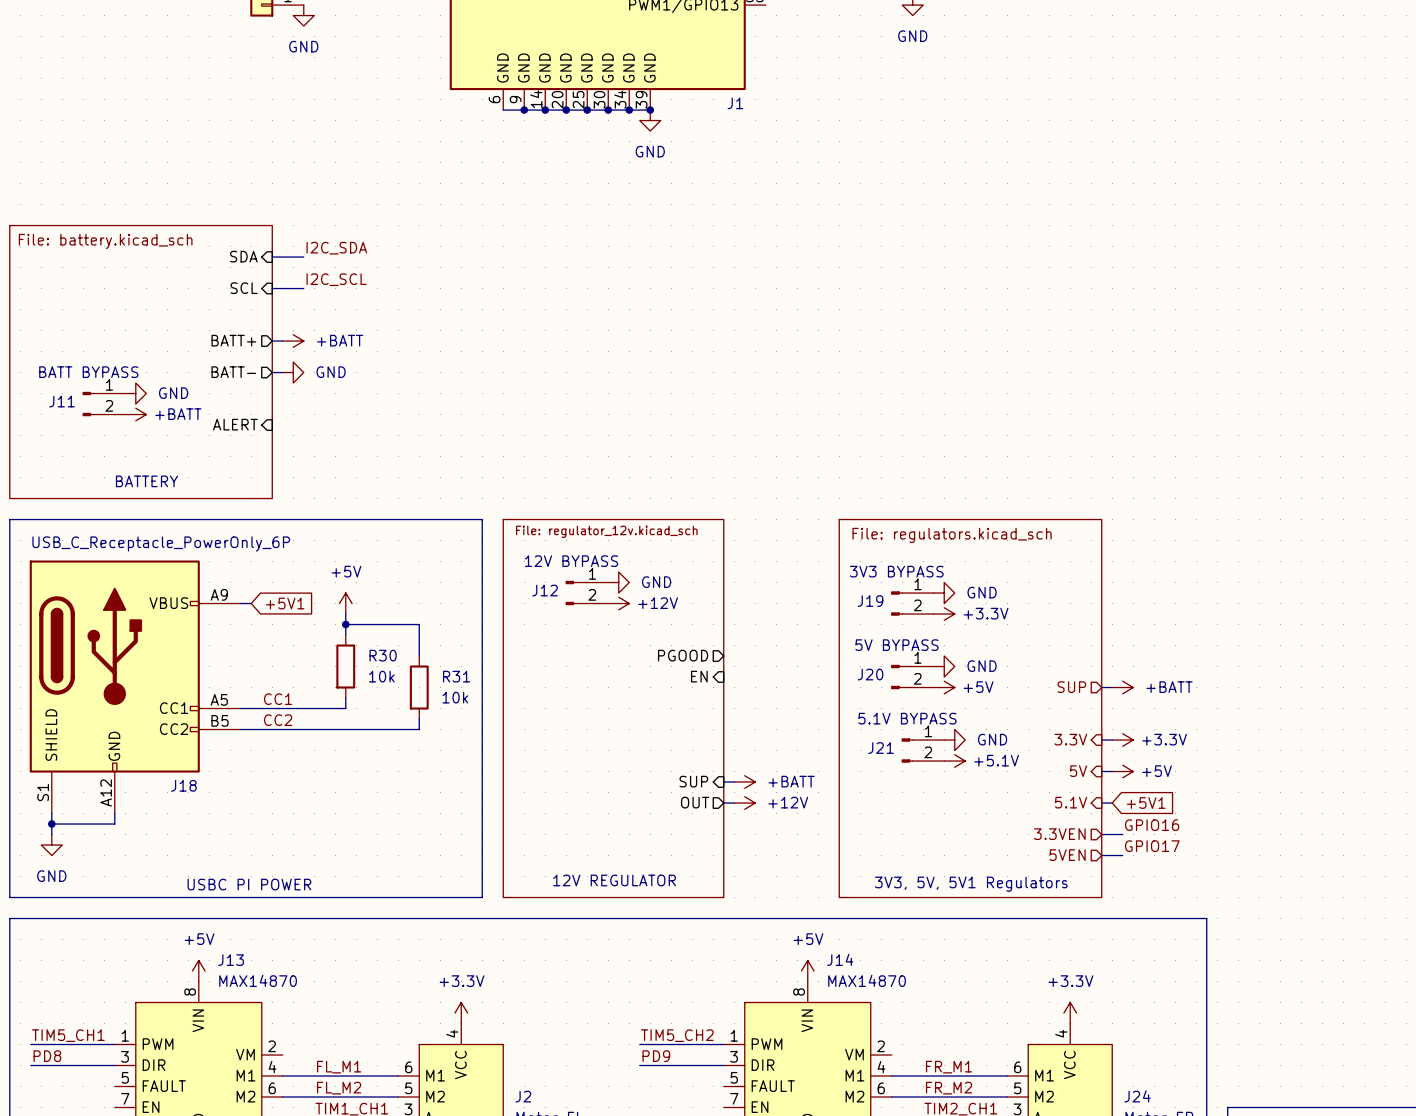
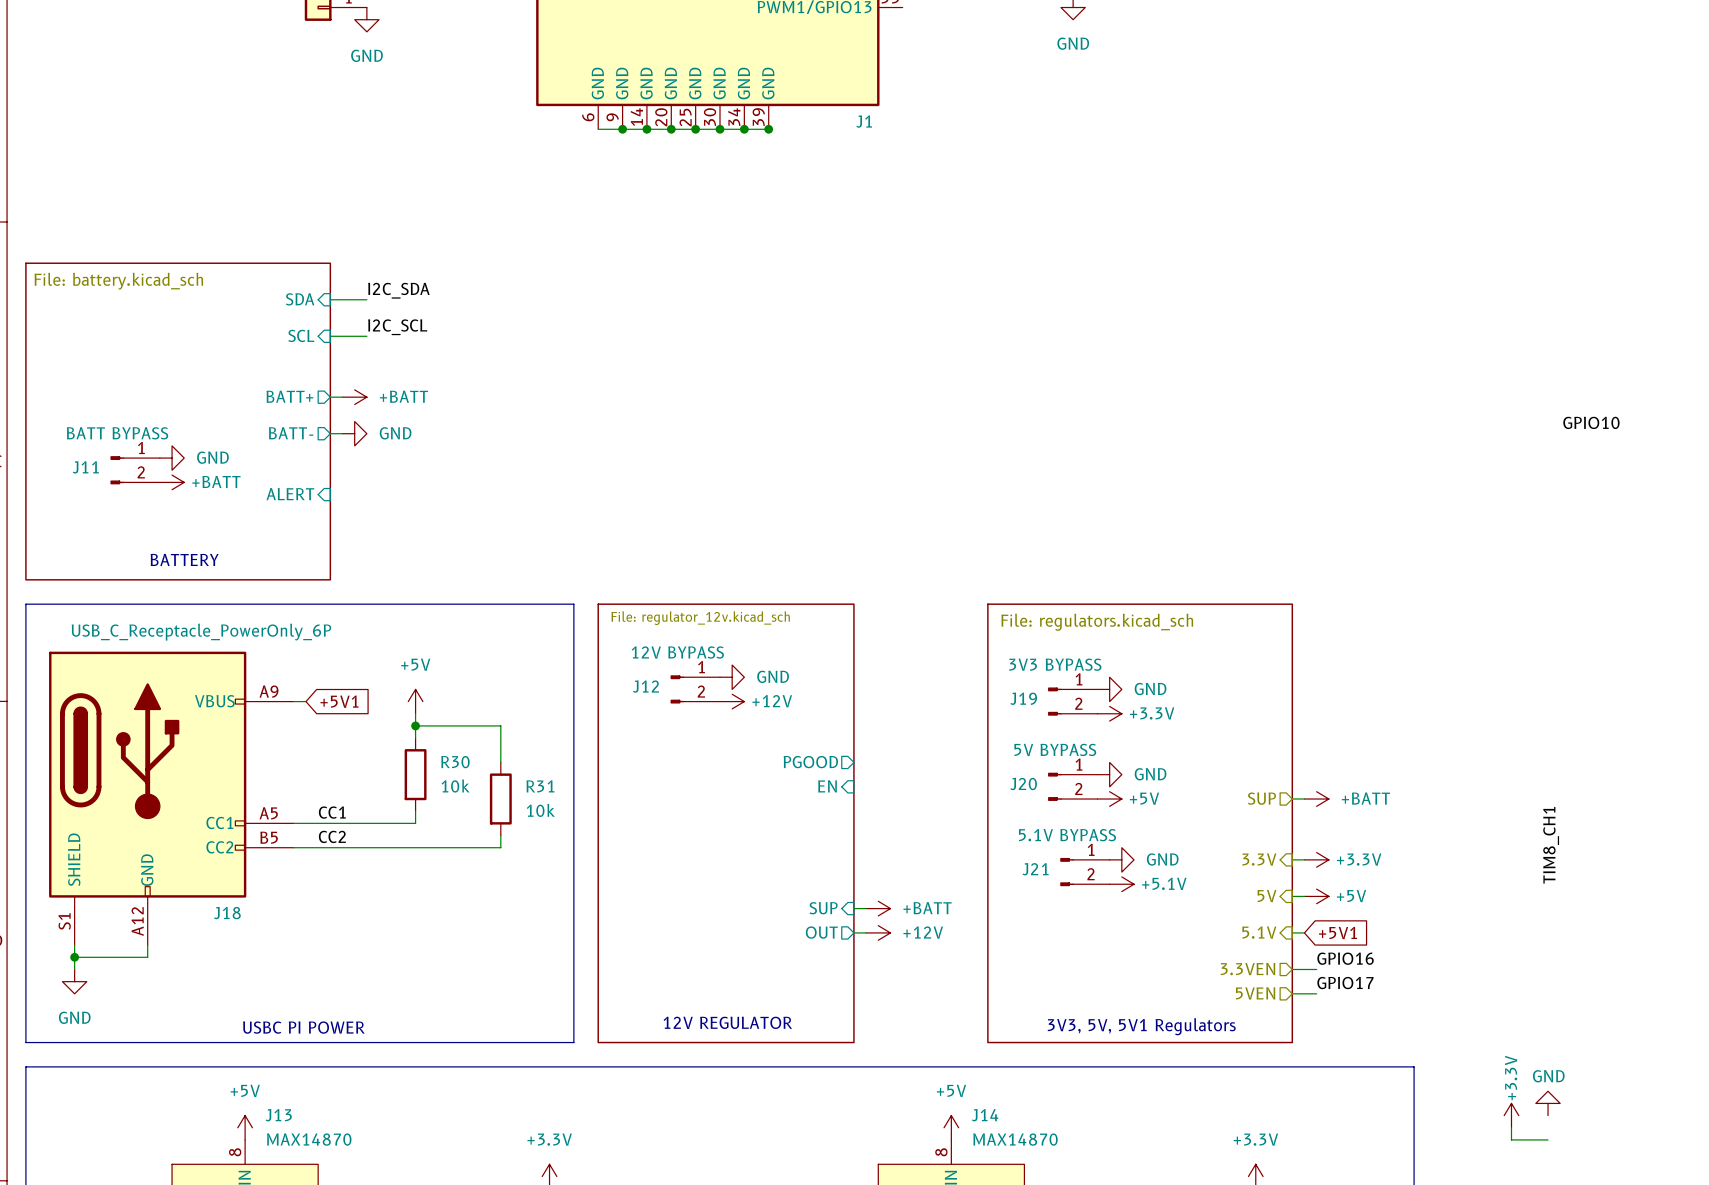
power symbol: GND (650, 120) -> none
label: none -> GPIO10 (1591, 422)
label: none -> TIM8_CH1 (1551, 845)
power symbol: none -> GND (1548, 1103)
power symbol: none -> +3.3V (1511, 1115)
wire: none -> (1511, 1127) (1511, 1139) (1548, 1139)

